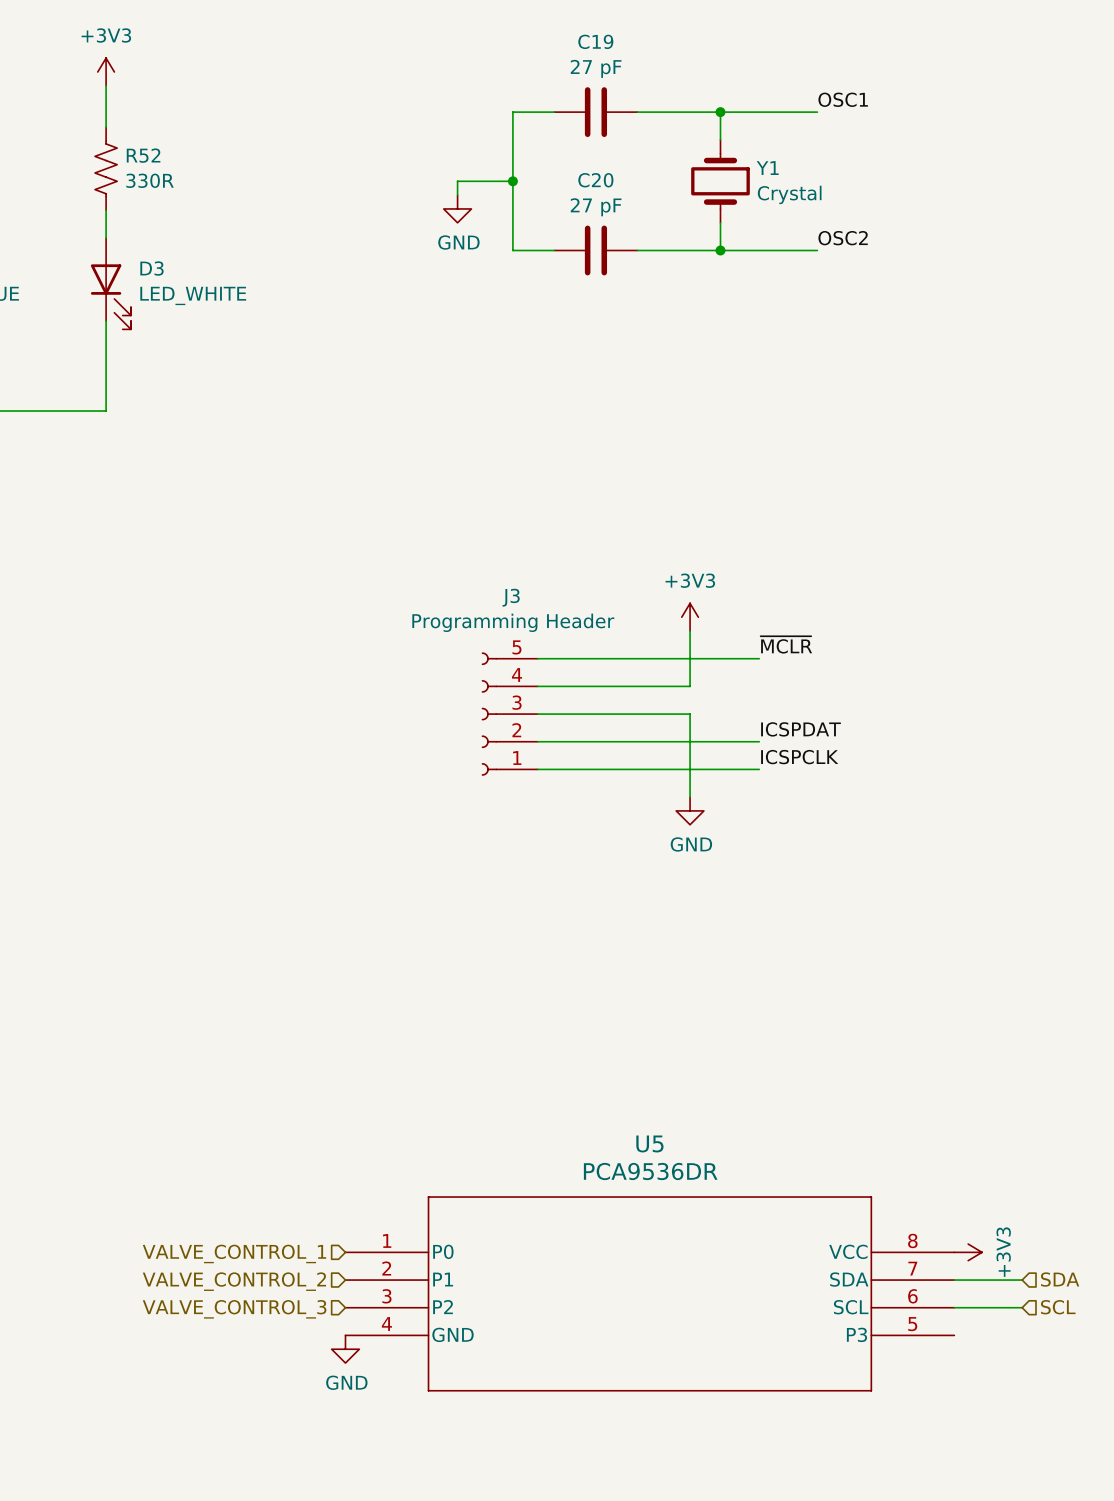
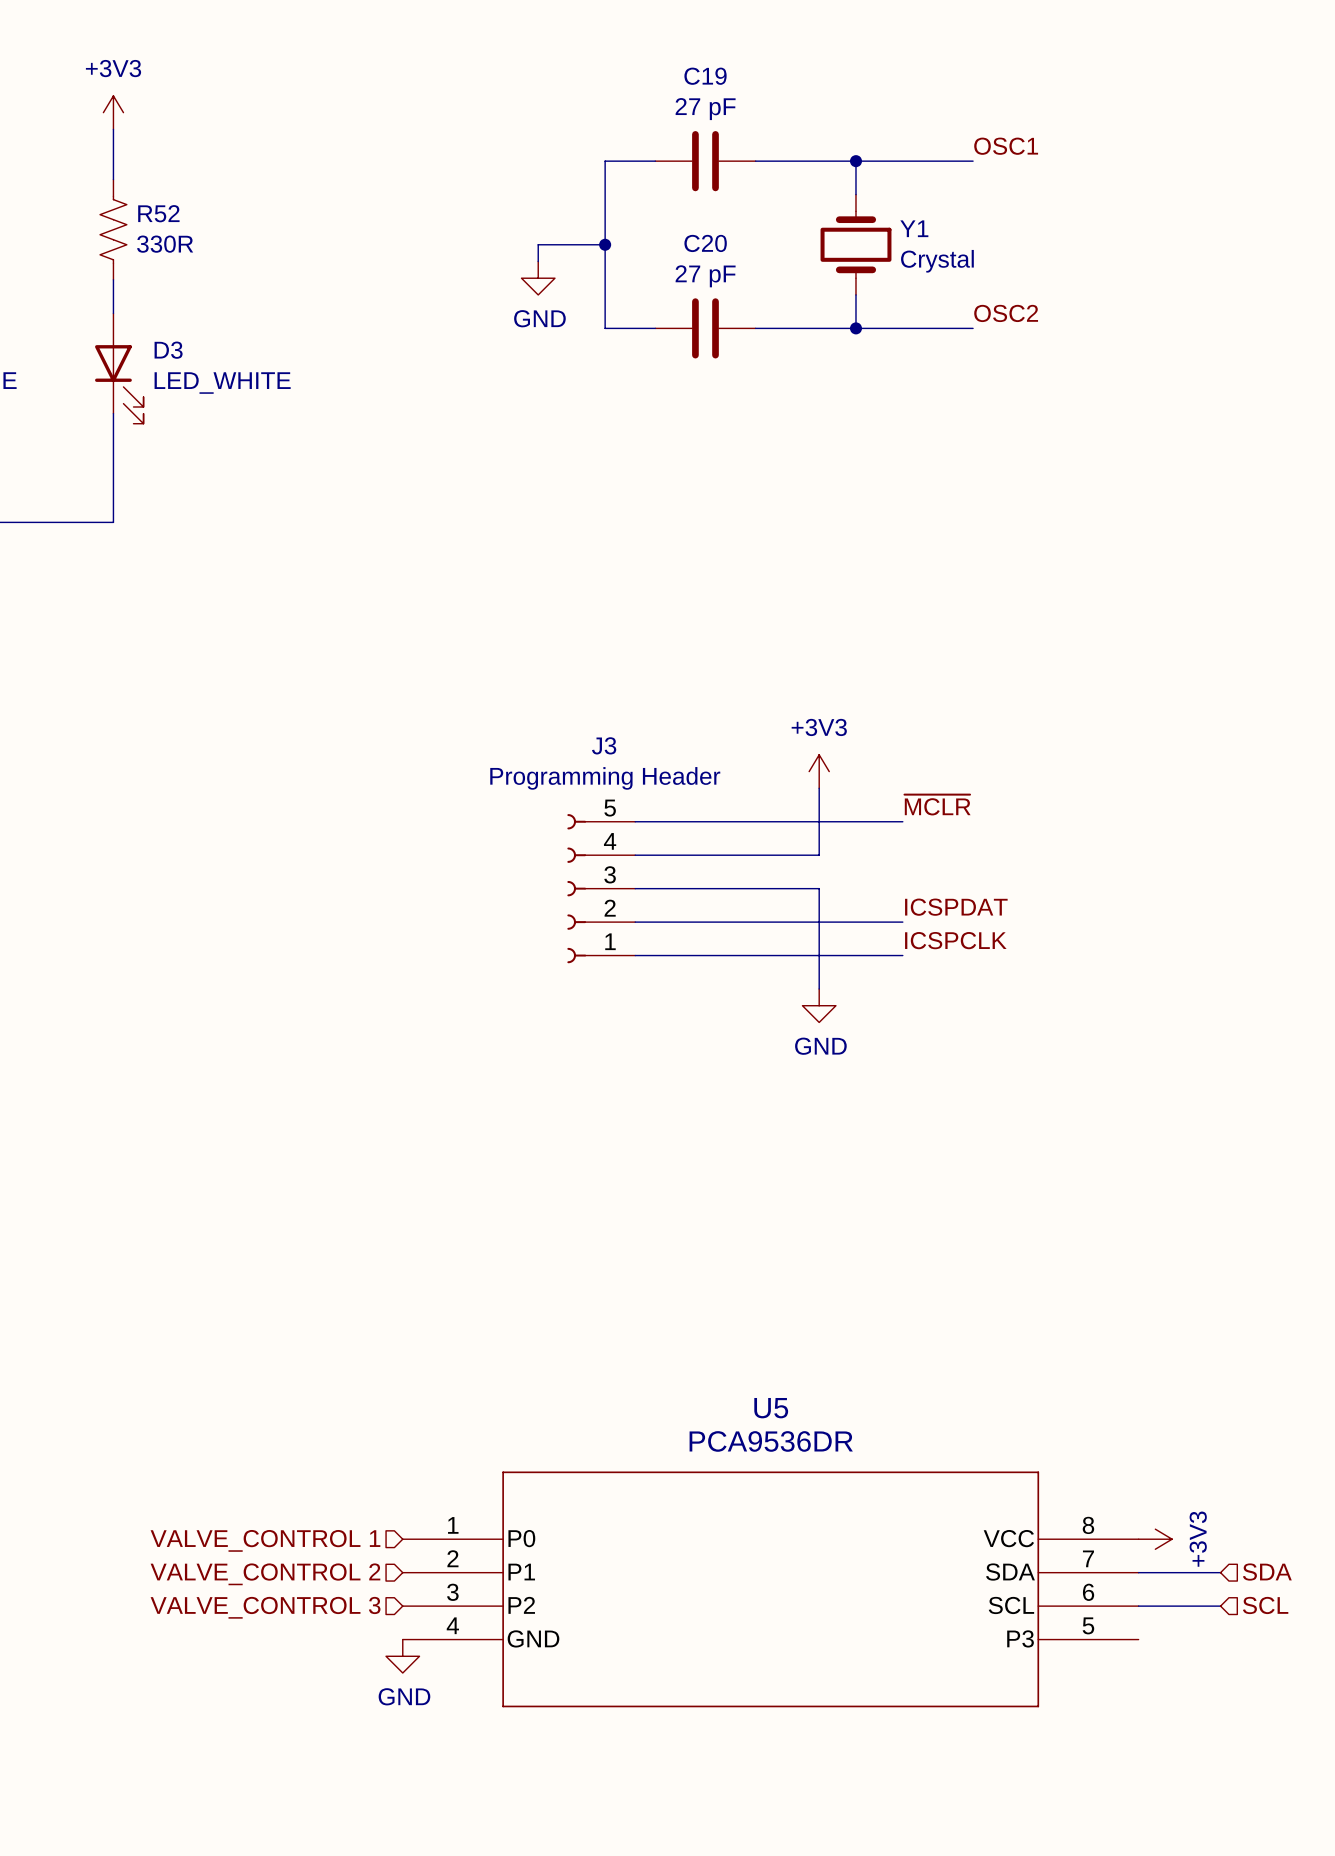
hierarchical label: VALVE_CONTROL_1 (234, 1253) -> VALVE_CONTROL 1 (265, 1540)
hierarchical label: VALVE_CONTROL_2 (234, 1281) -> VALVE_CONTROL 2 (265, 1574)
hierarchical label: VALVE_CONTROL_3 (234, 1309) -> VALVE_CONTROL 3 (265, 1607)

